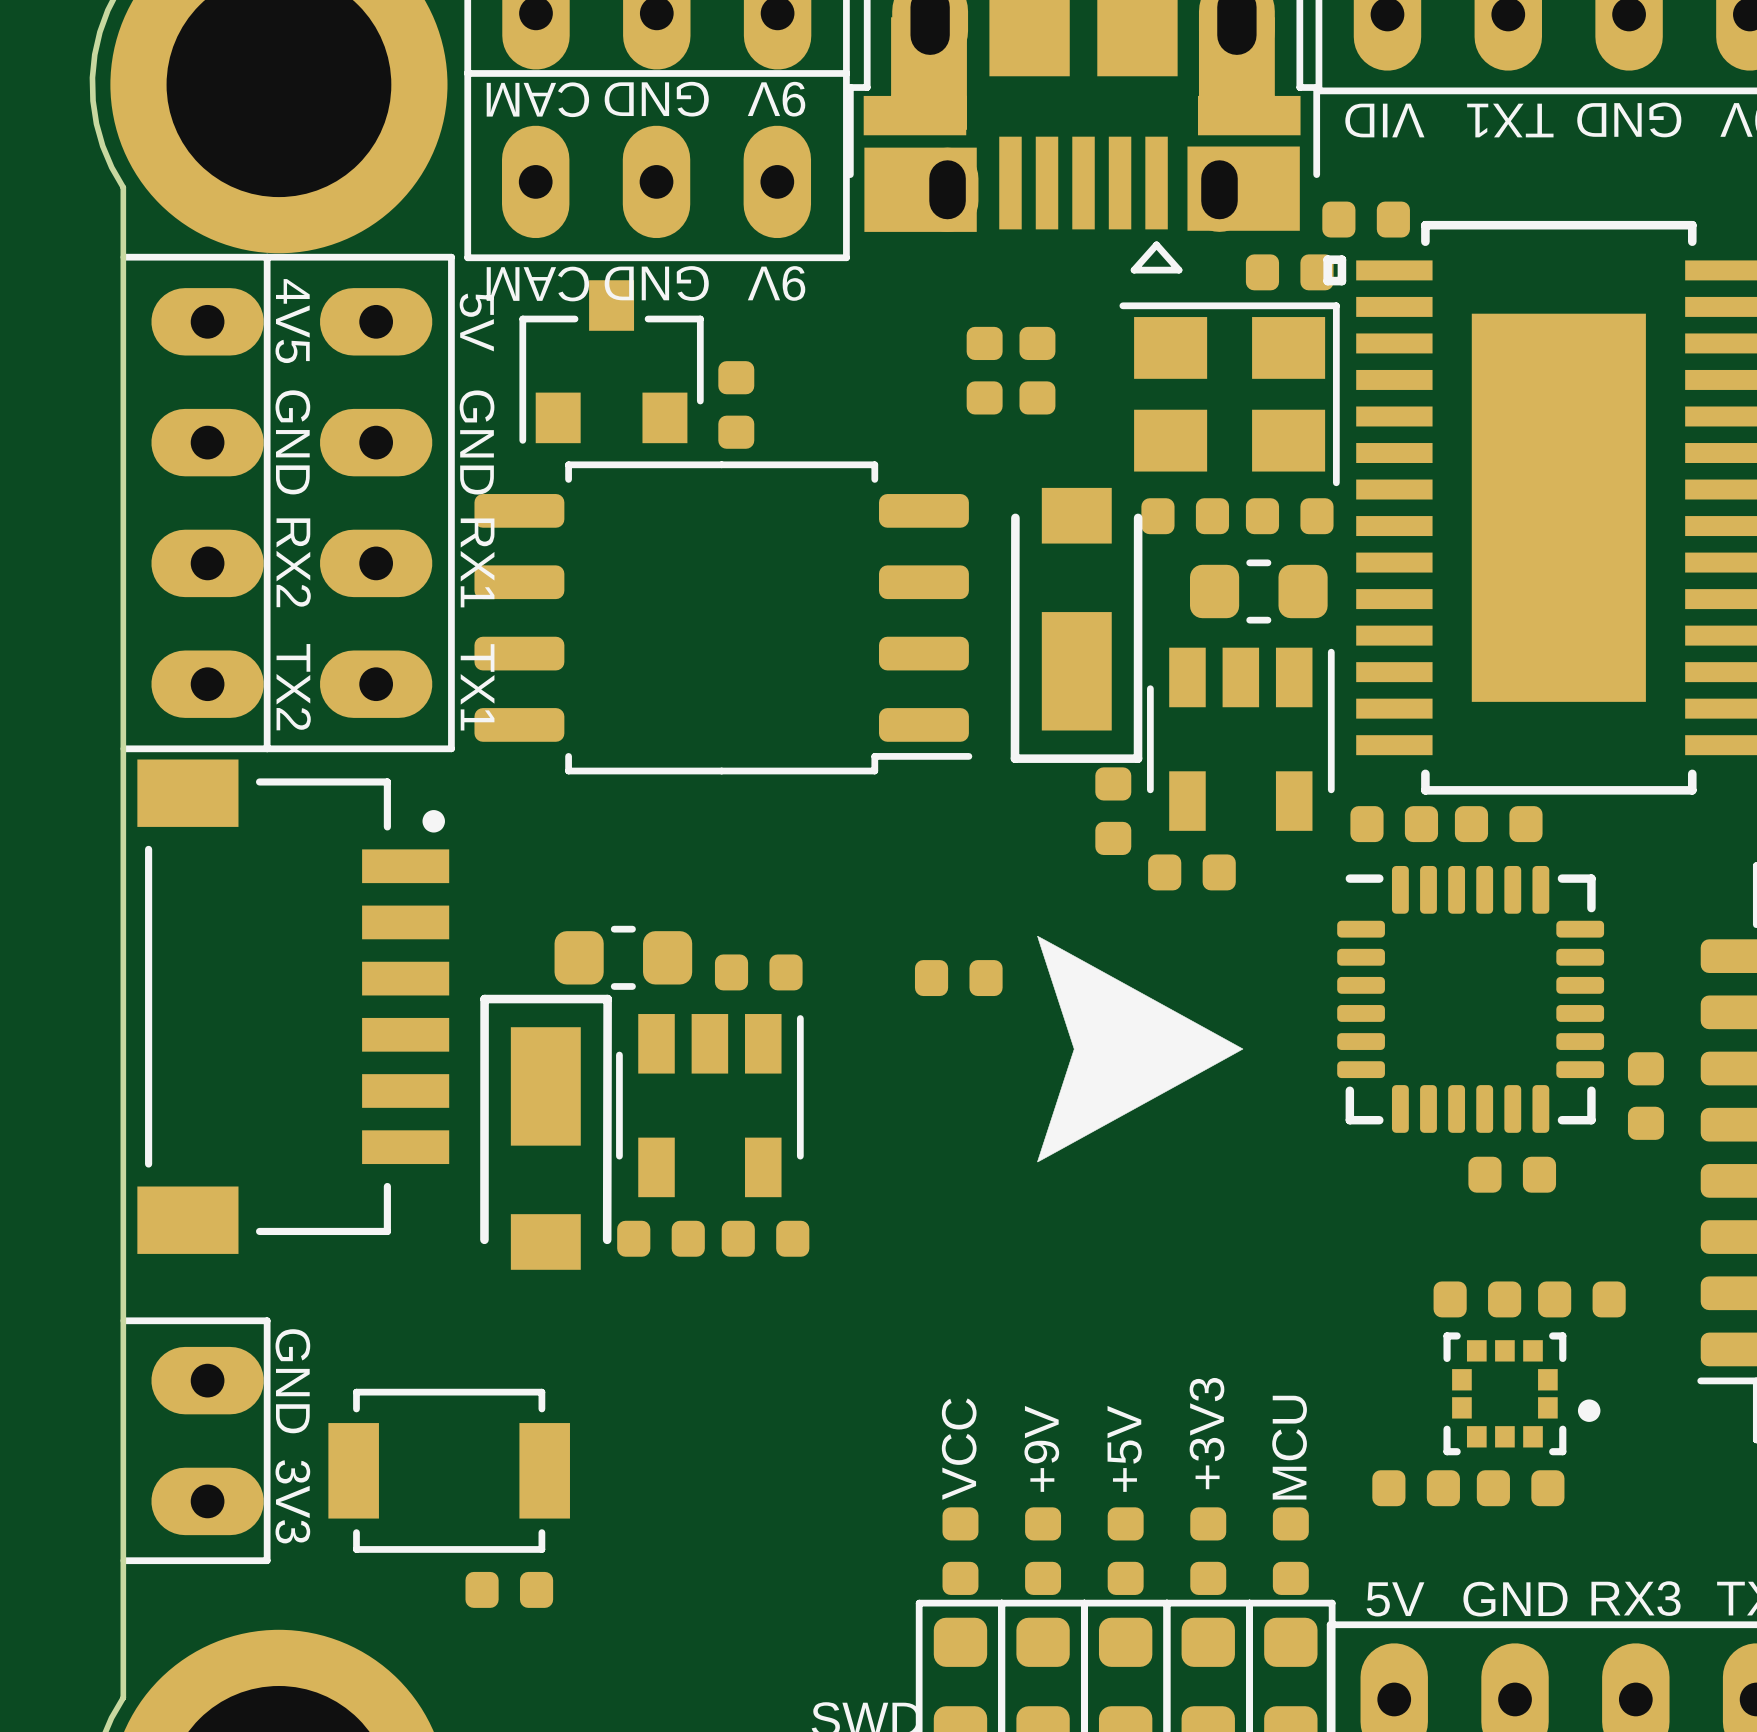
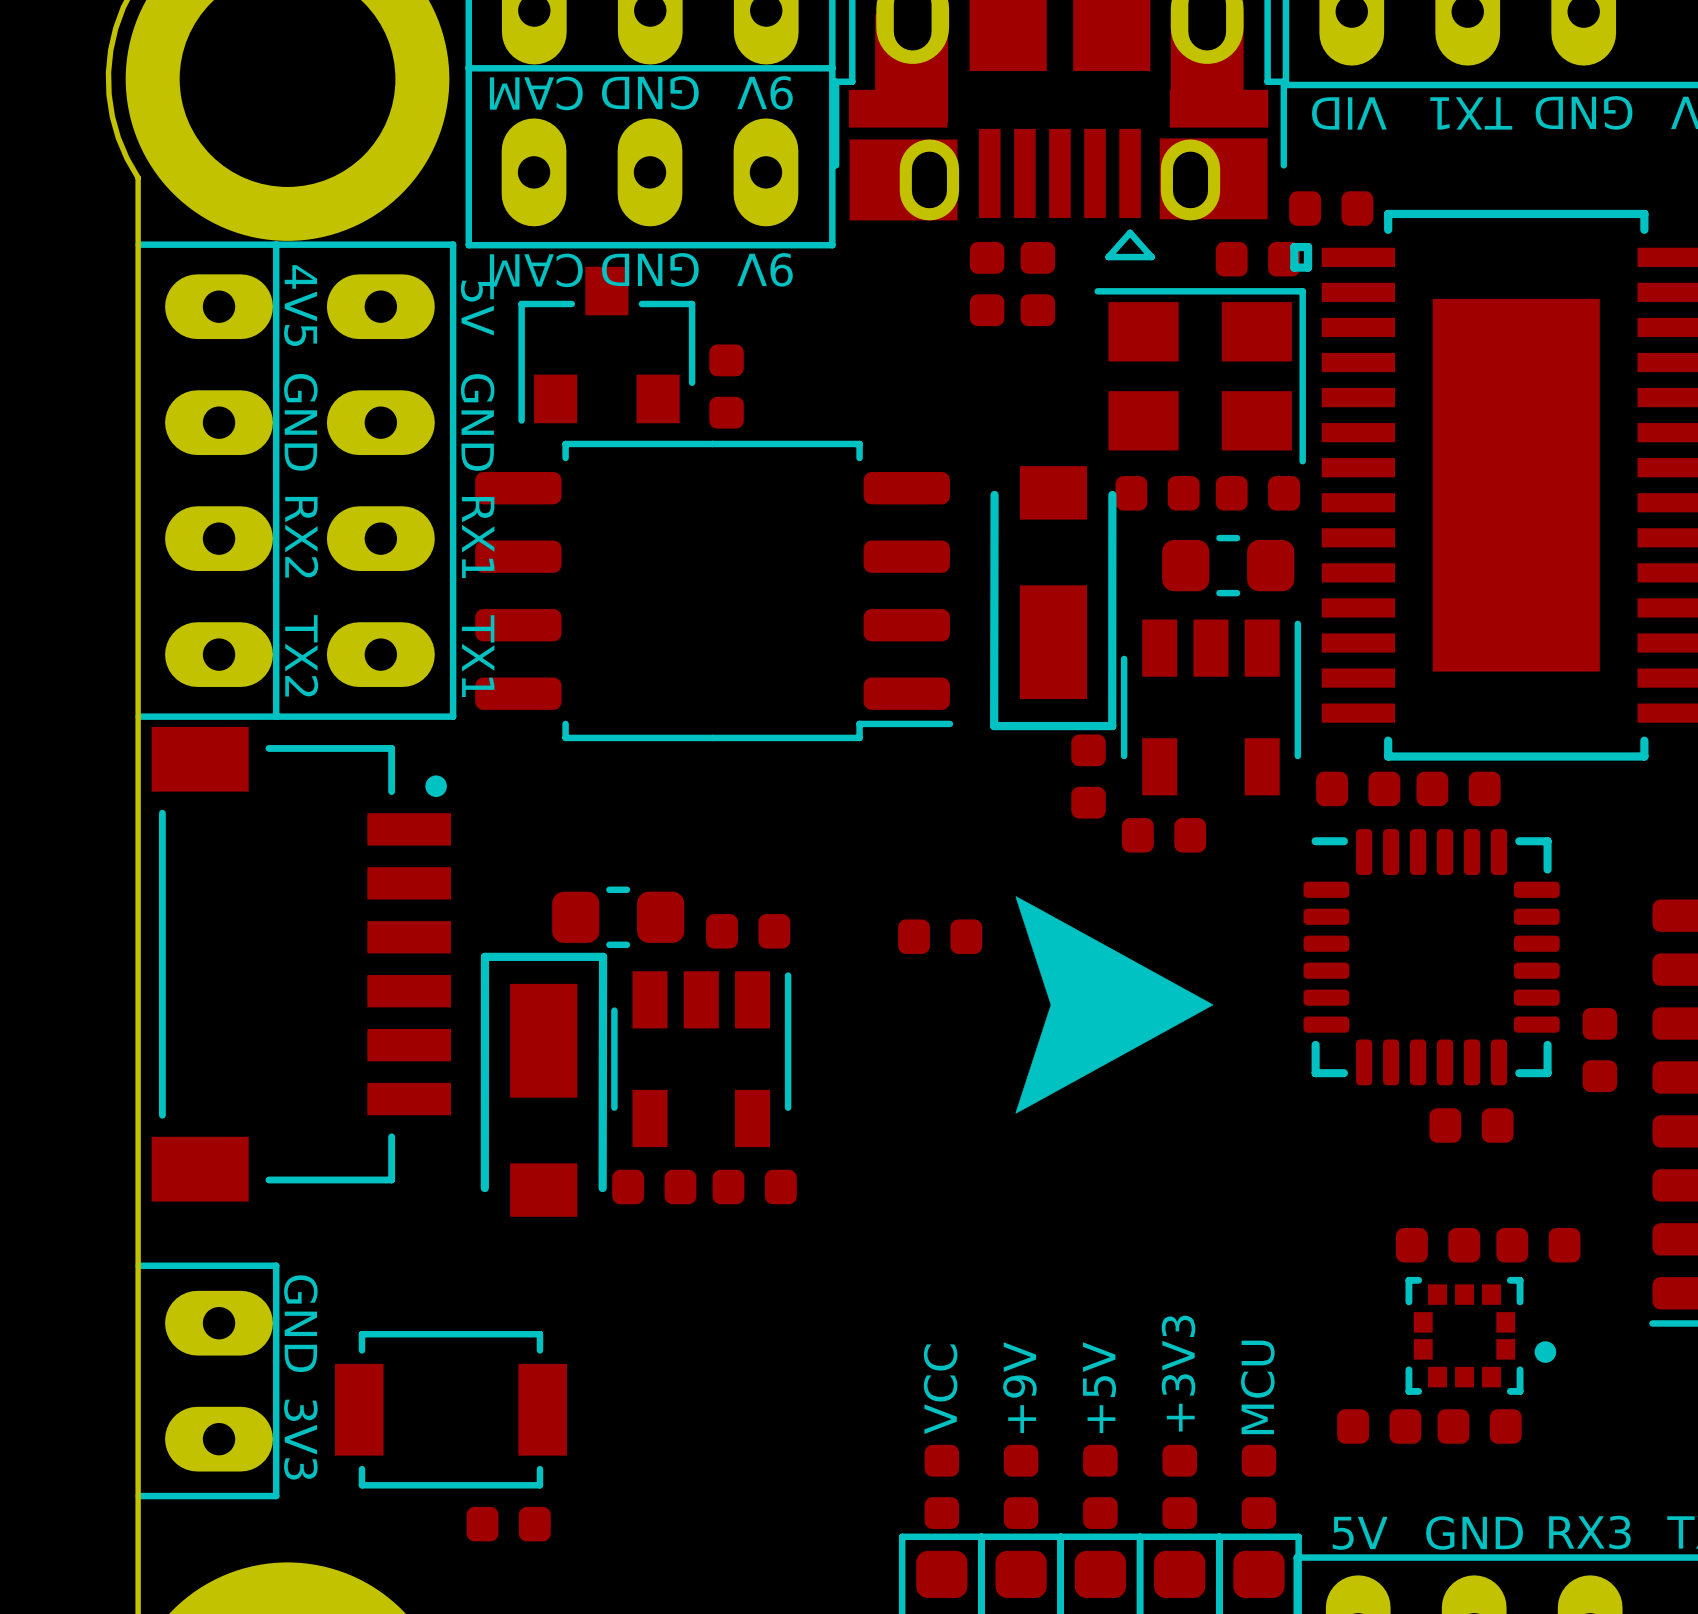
part: none -> (987, 284)
part: none -> (1037, 284)
part: (984, 370) -> none
part: (1037, 370) -> none

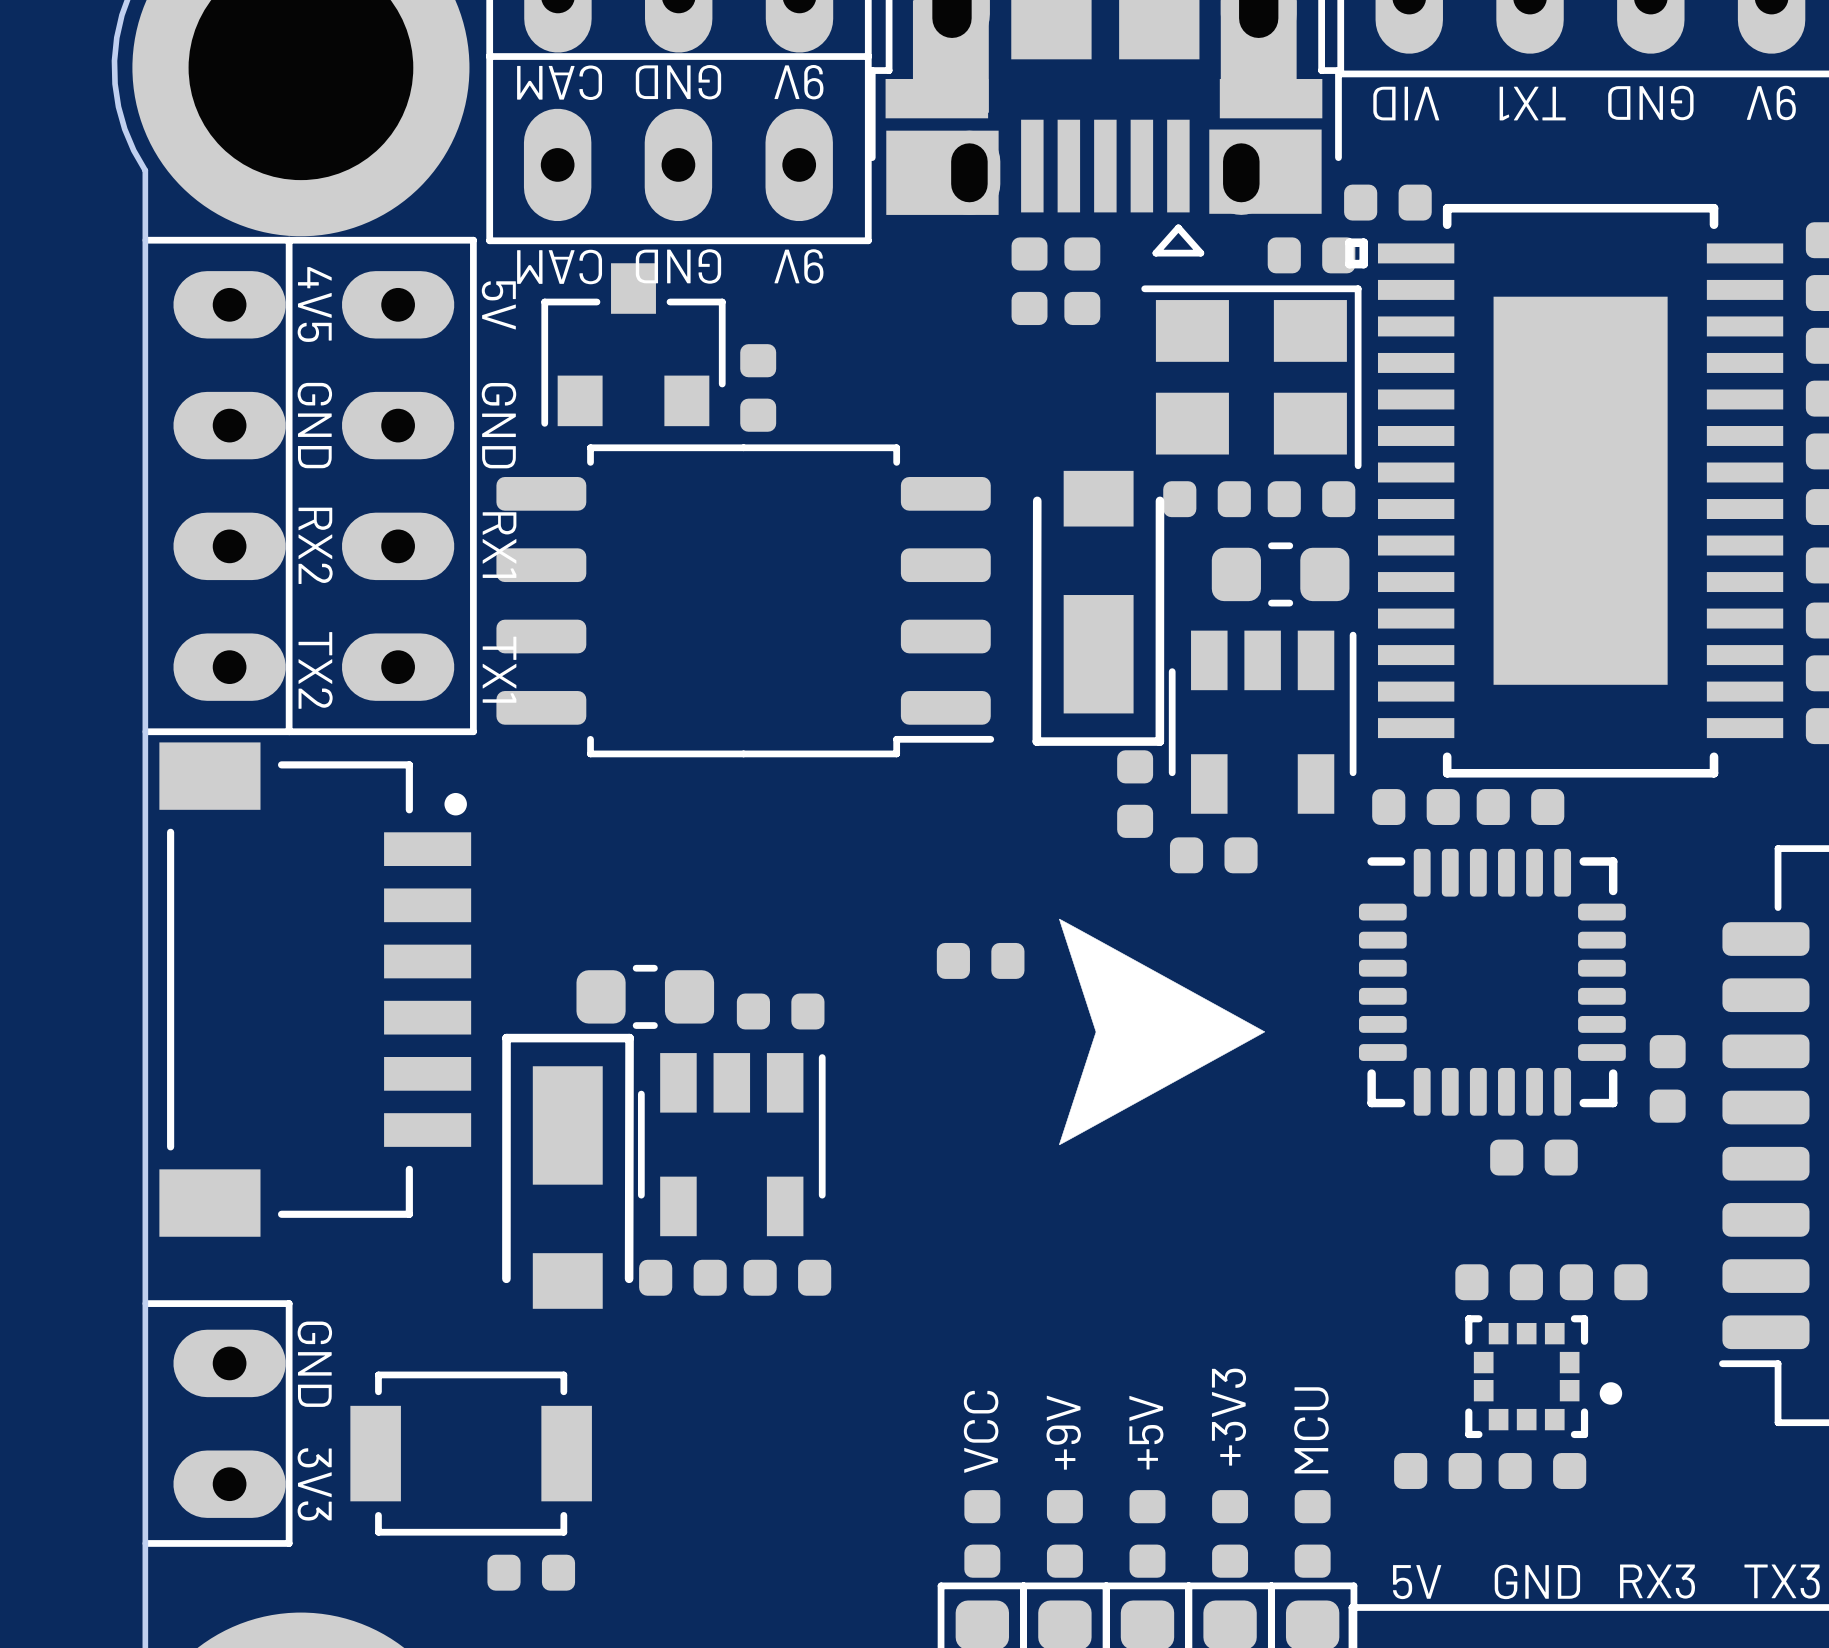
part position: (618, 917) -> (645, 996)
part position: (748, 931) -> (780, 1011)
part position: (701, 1059) -> (731, 1144)
part position: (543, 1084) -> (567, 1171)
part position: (654, 1186) -> (682, 1277)
part position: (754, 1186) -> (787, 1277)

